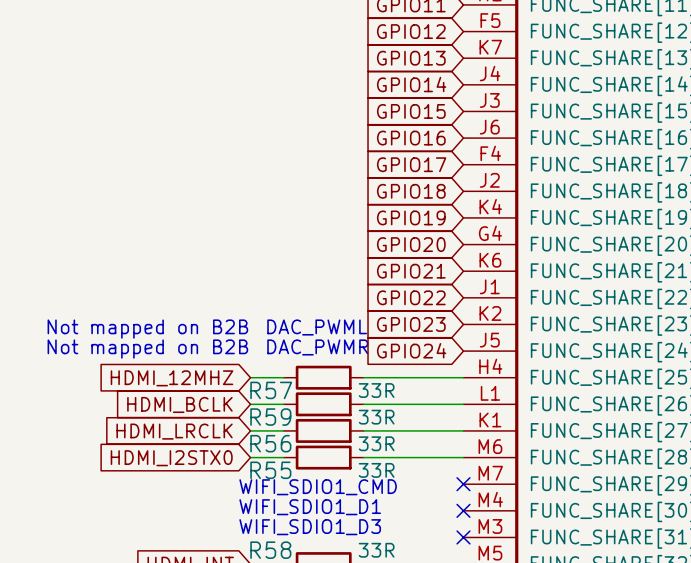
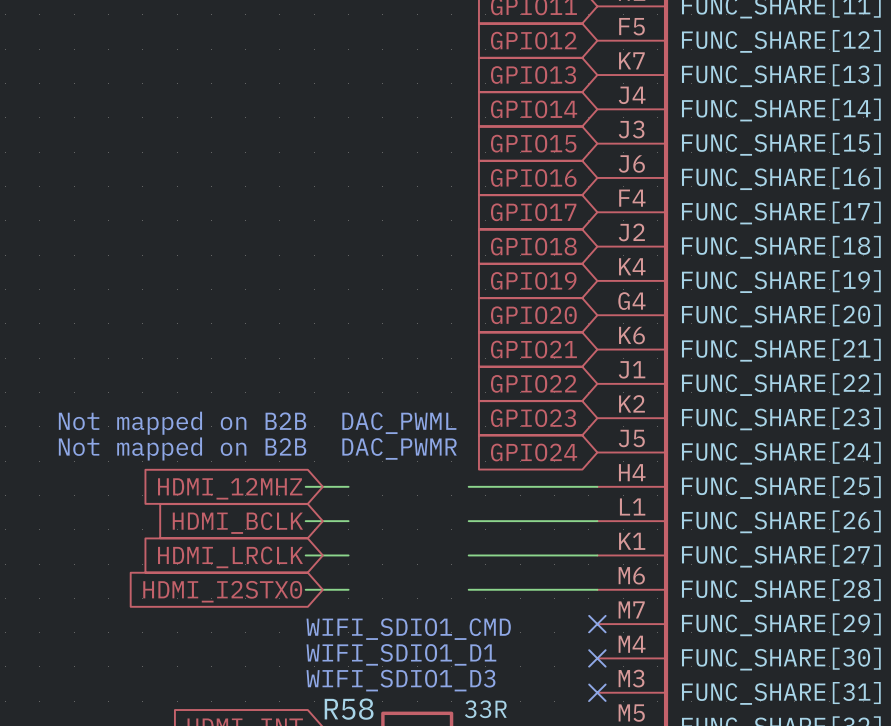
wire: (270, 377) (283, 377) -> (305, 486) (322, 486)
R57: (323, 377) -> none
wire: (270, 404) (283, 404) -> (305, 521) (322, 521)
R59: (323, 404) -> none
wire: (270, 430) (283, 430) -> (305, 555) (322, 555)
R56: (323, 430) -> none
wire: (270, 457) (283, 457) -> (305, 589) (322, 589)
R55: (323, 457) -> none

